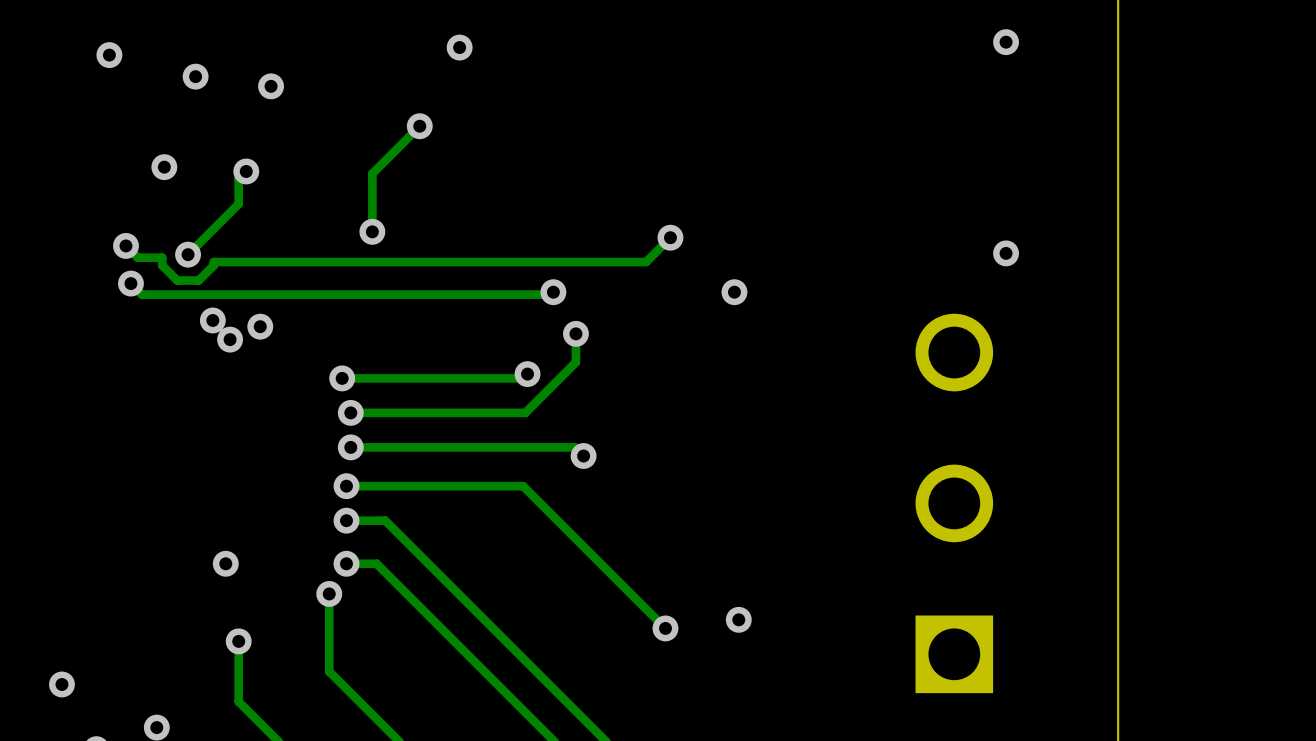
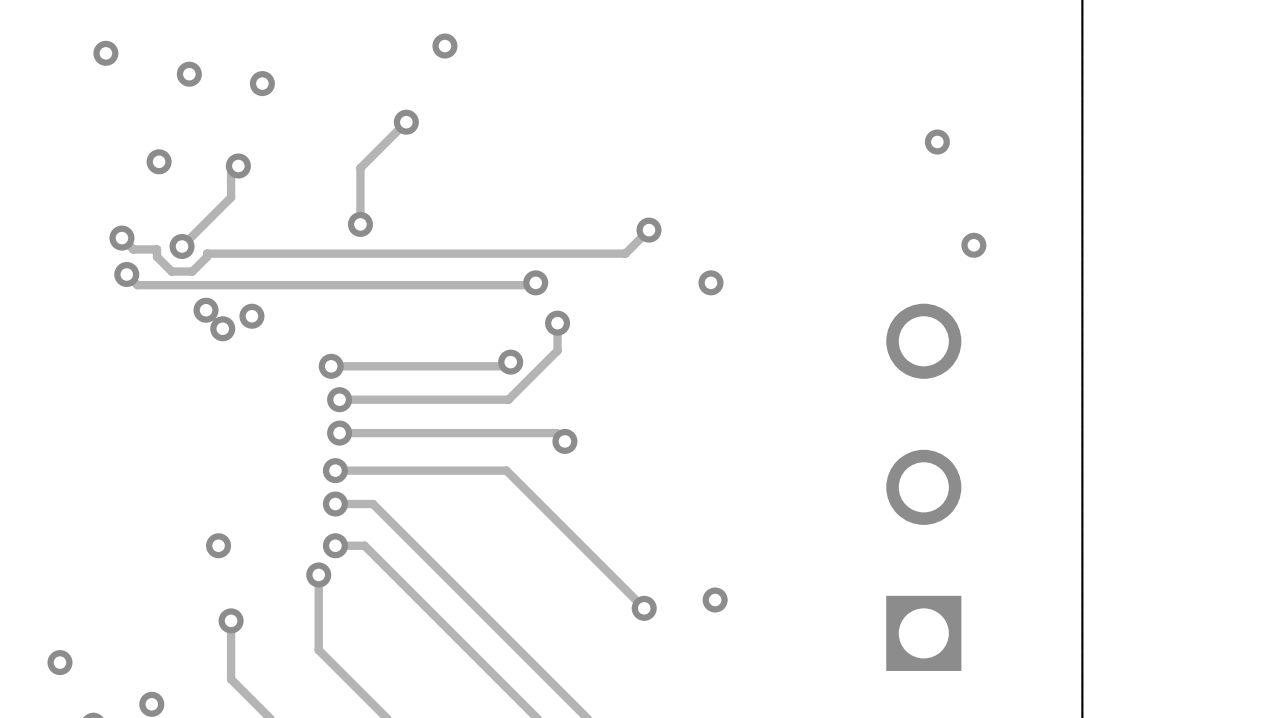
via position: (1006, 42) -> (937, 142)

